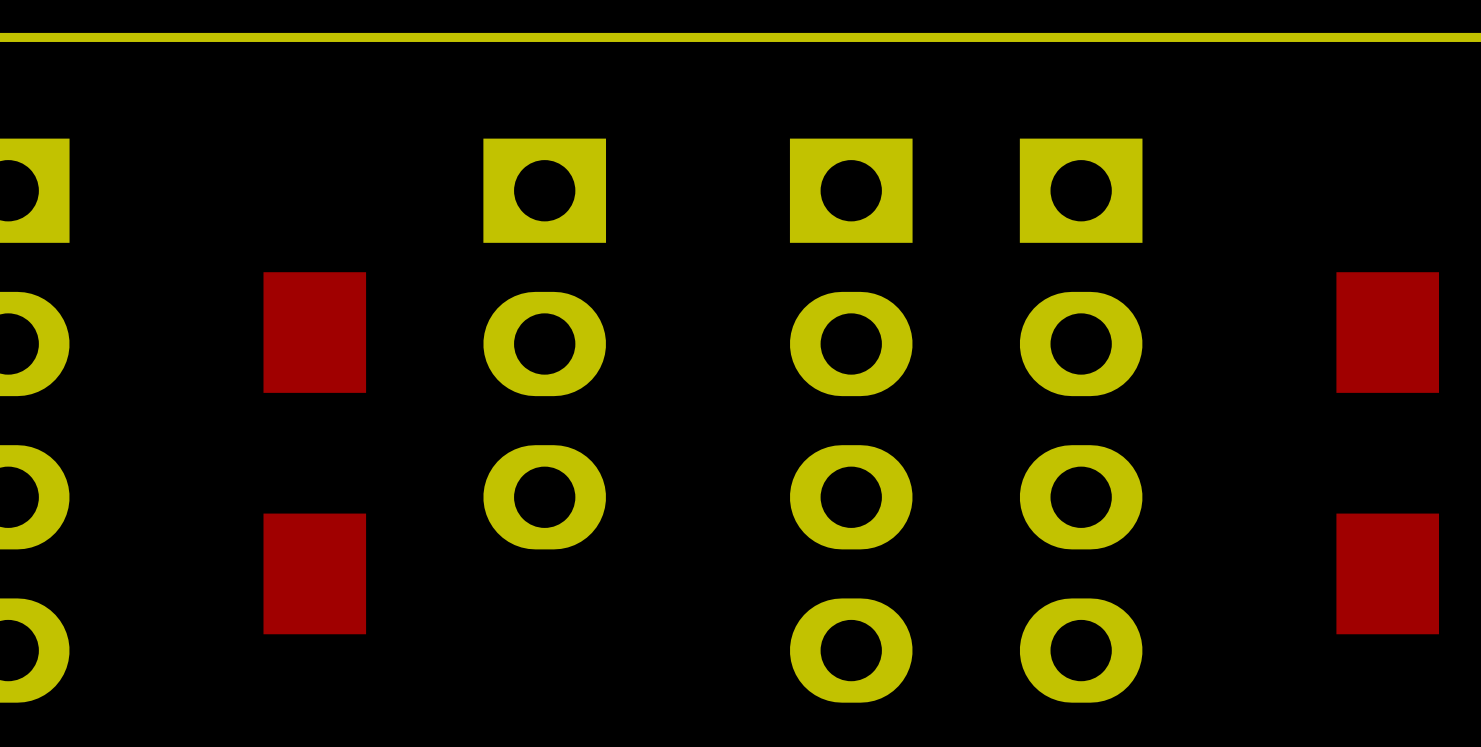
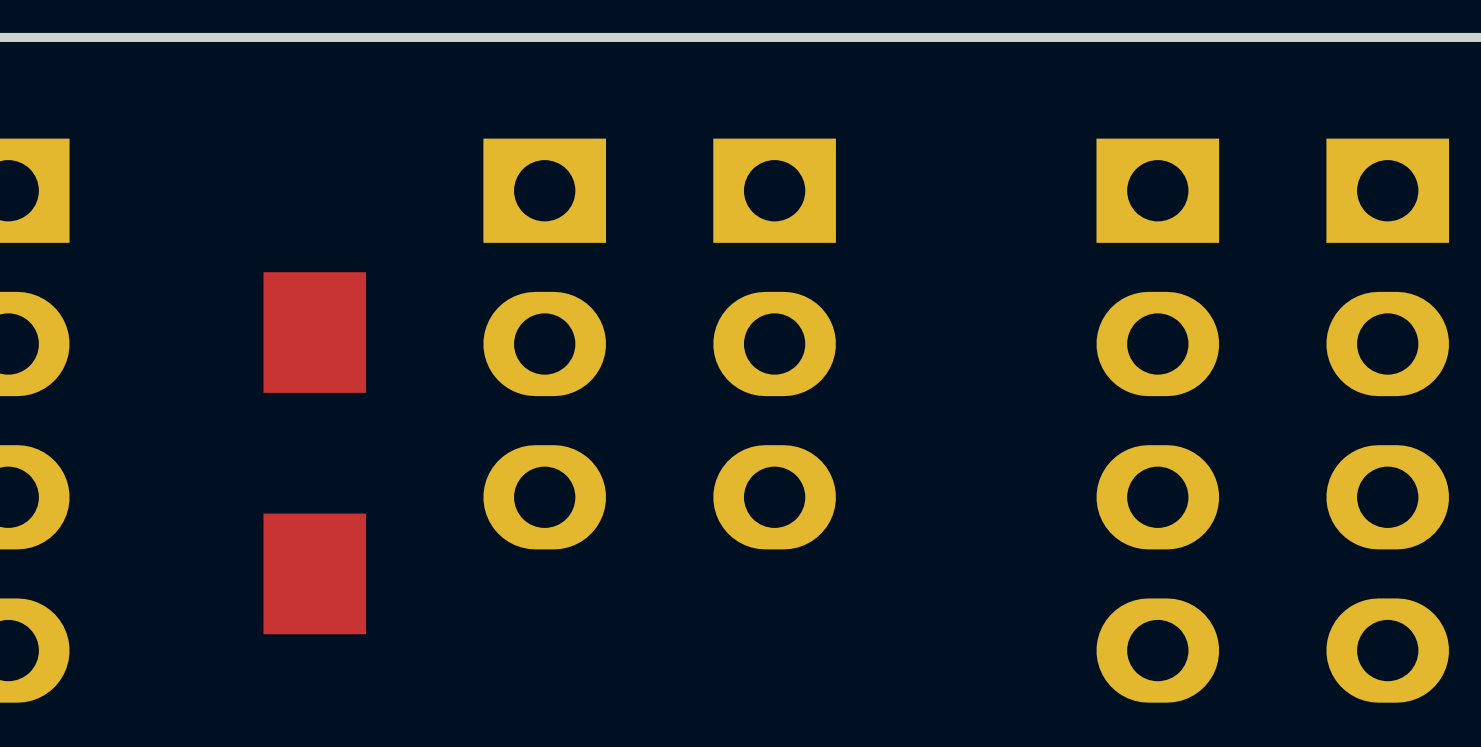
part footprint: [1336, 272, 1440, 635] -> [1326, 138, 1450, 703]
part: none -> (774, 344)
part: (851, 420) -> none
part position: (1081, 420) -> (1157, 420)

